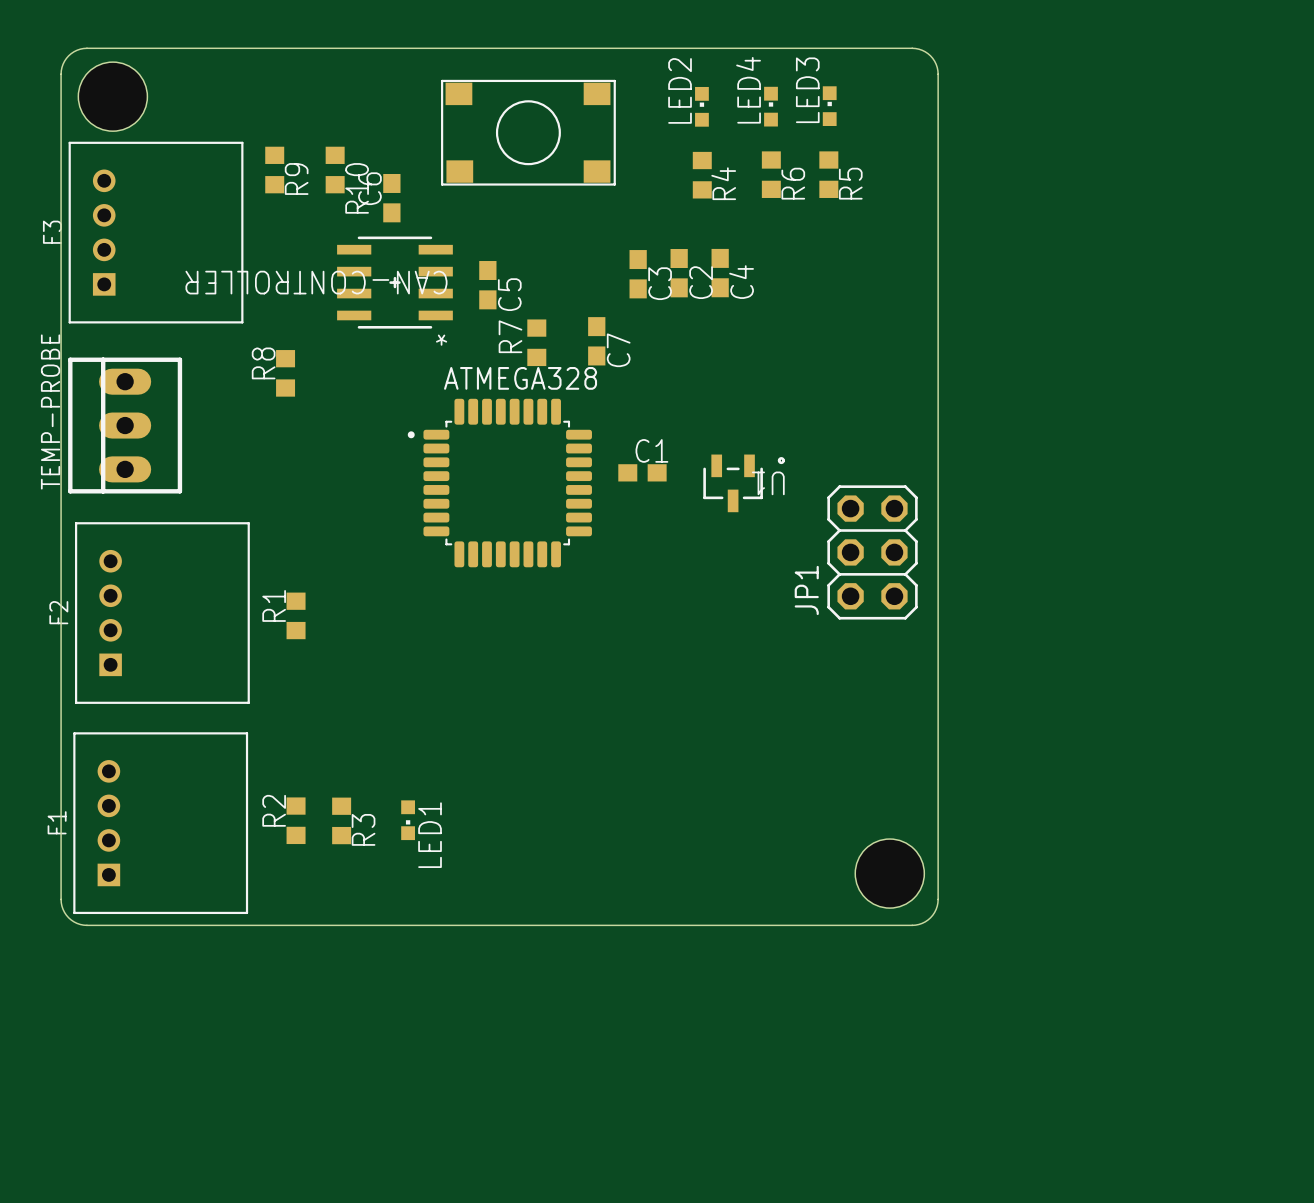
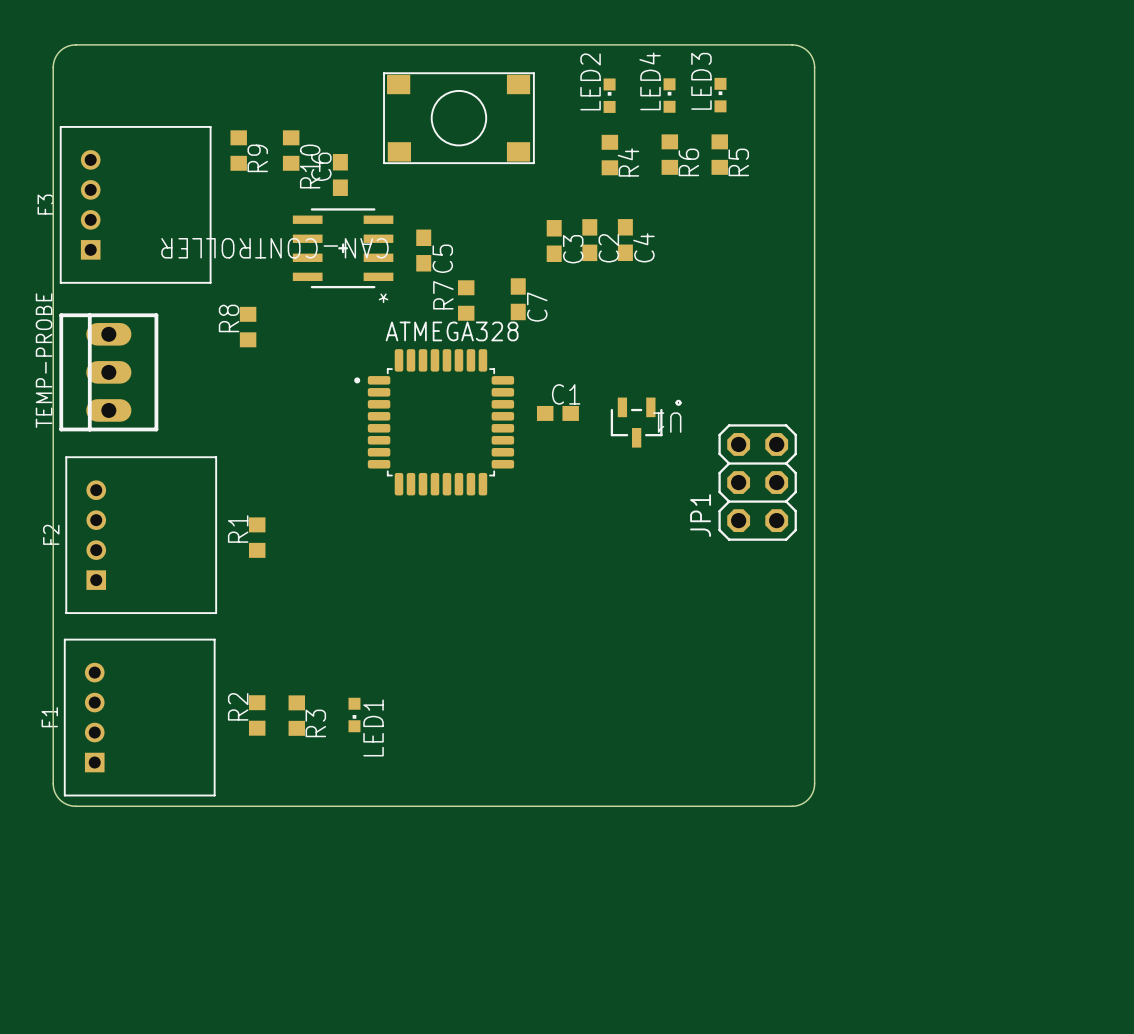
hole: (112, 96) -> none
hole: (889, 873) -> none

